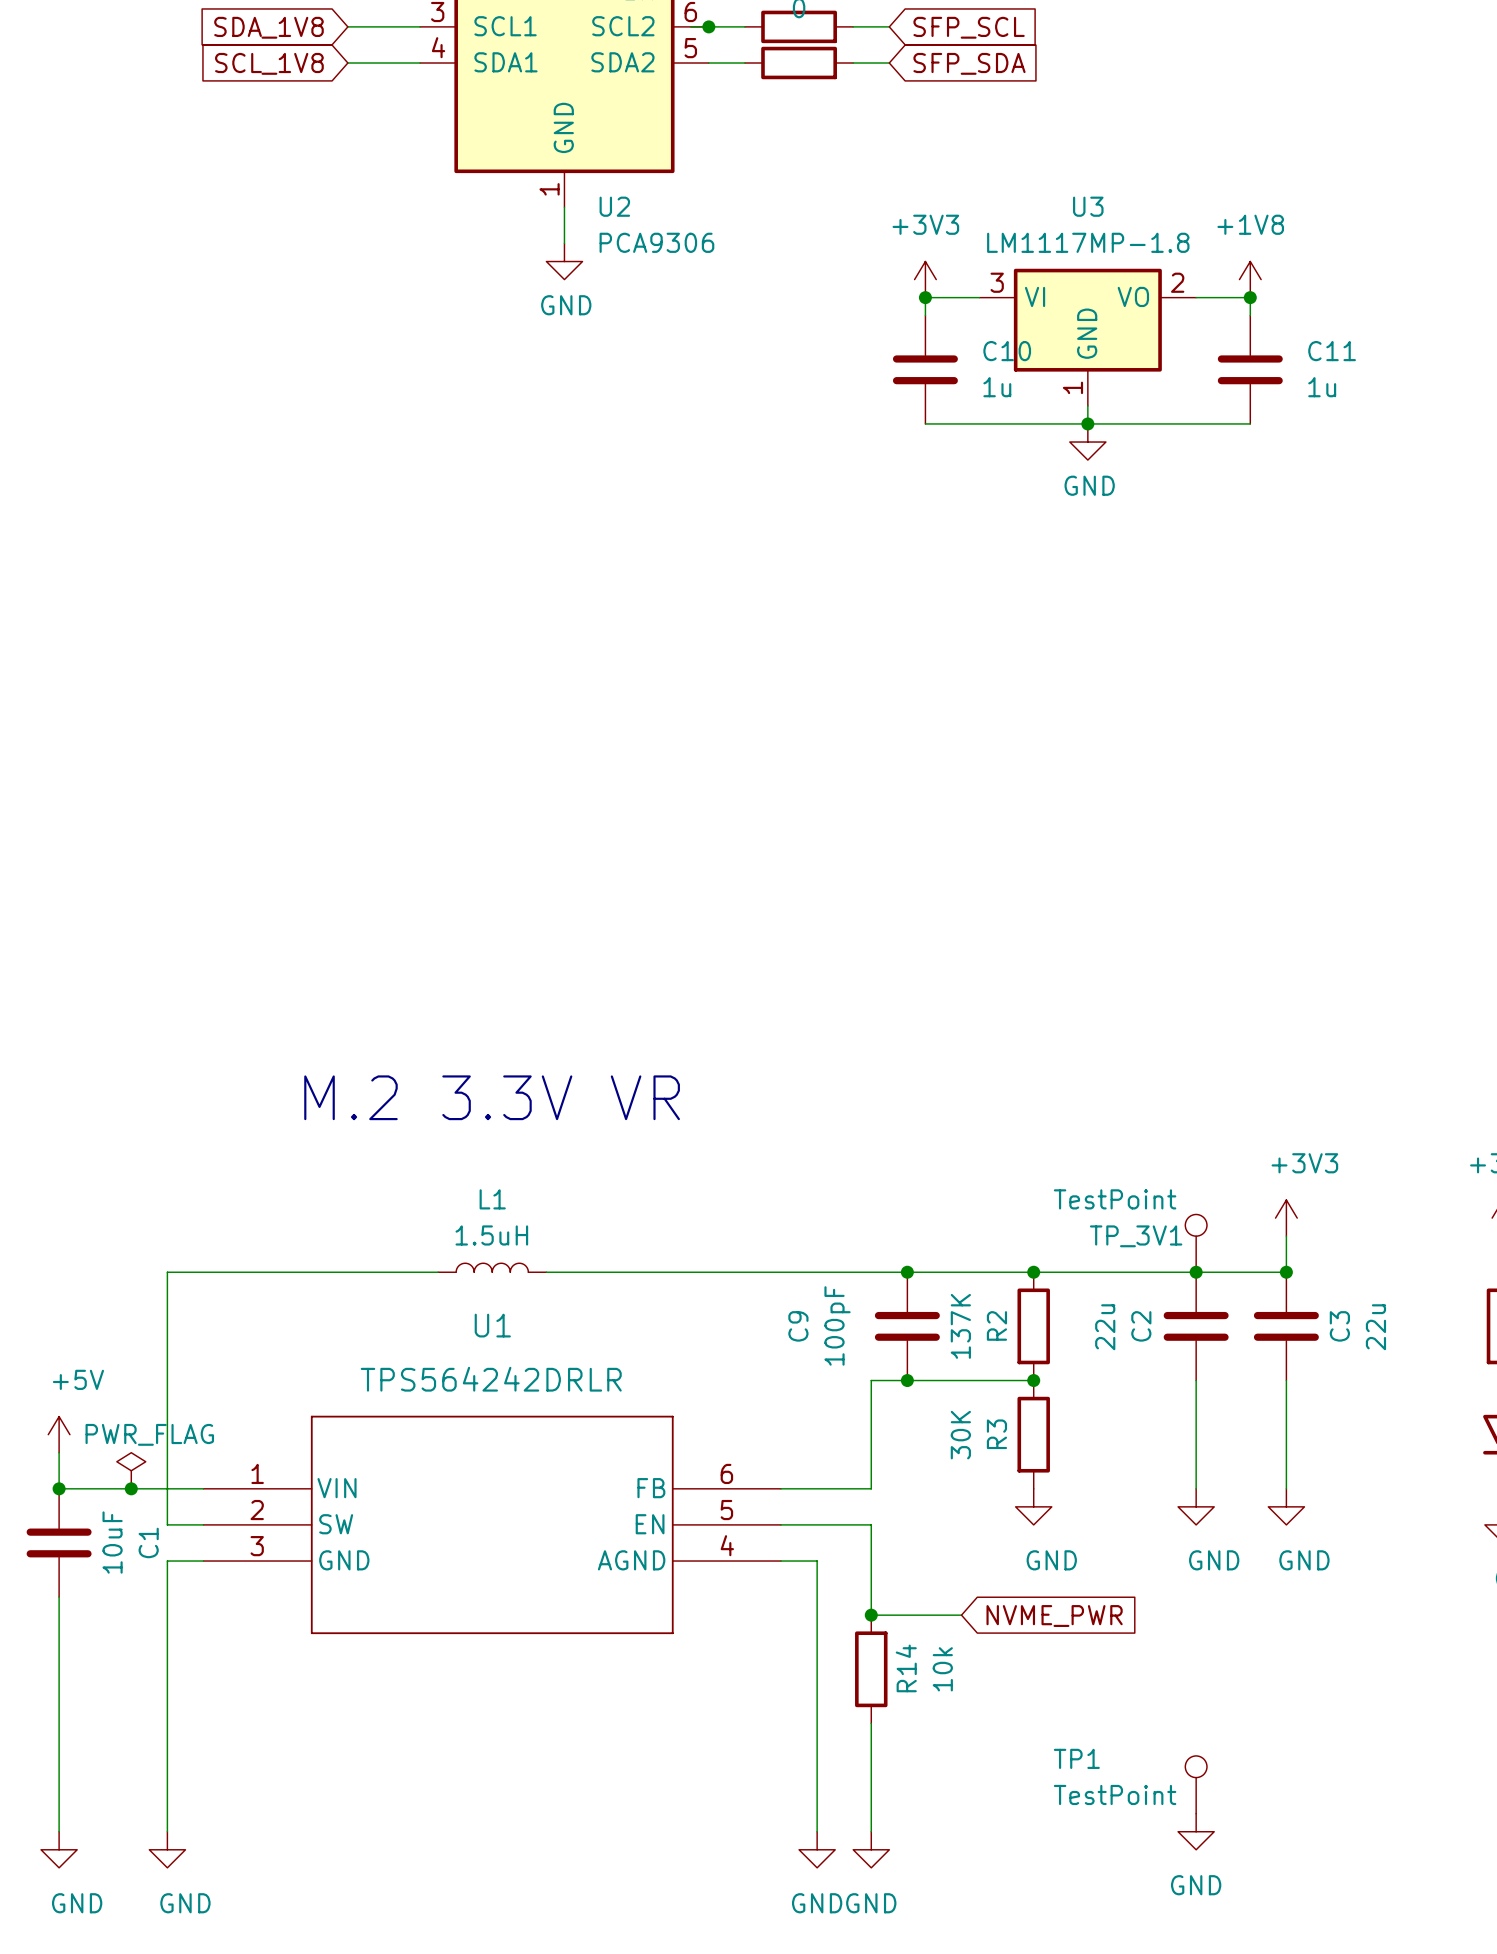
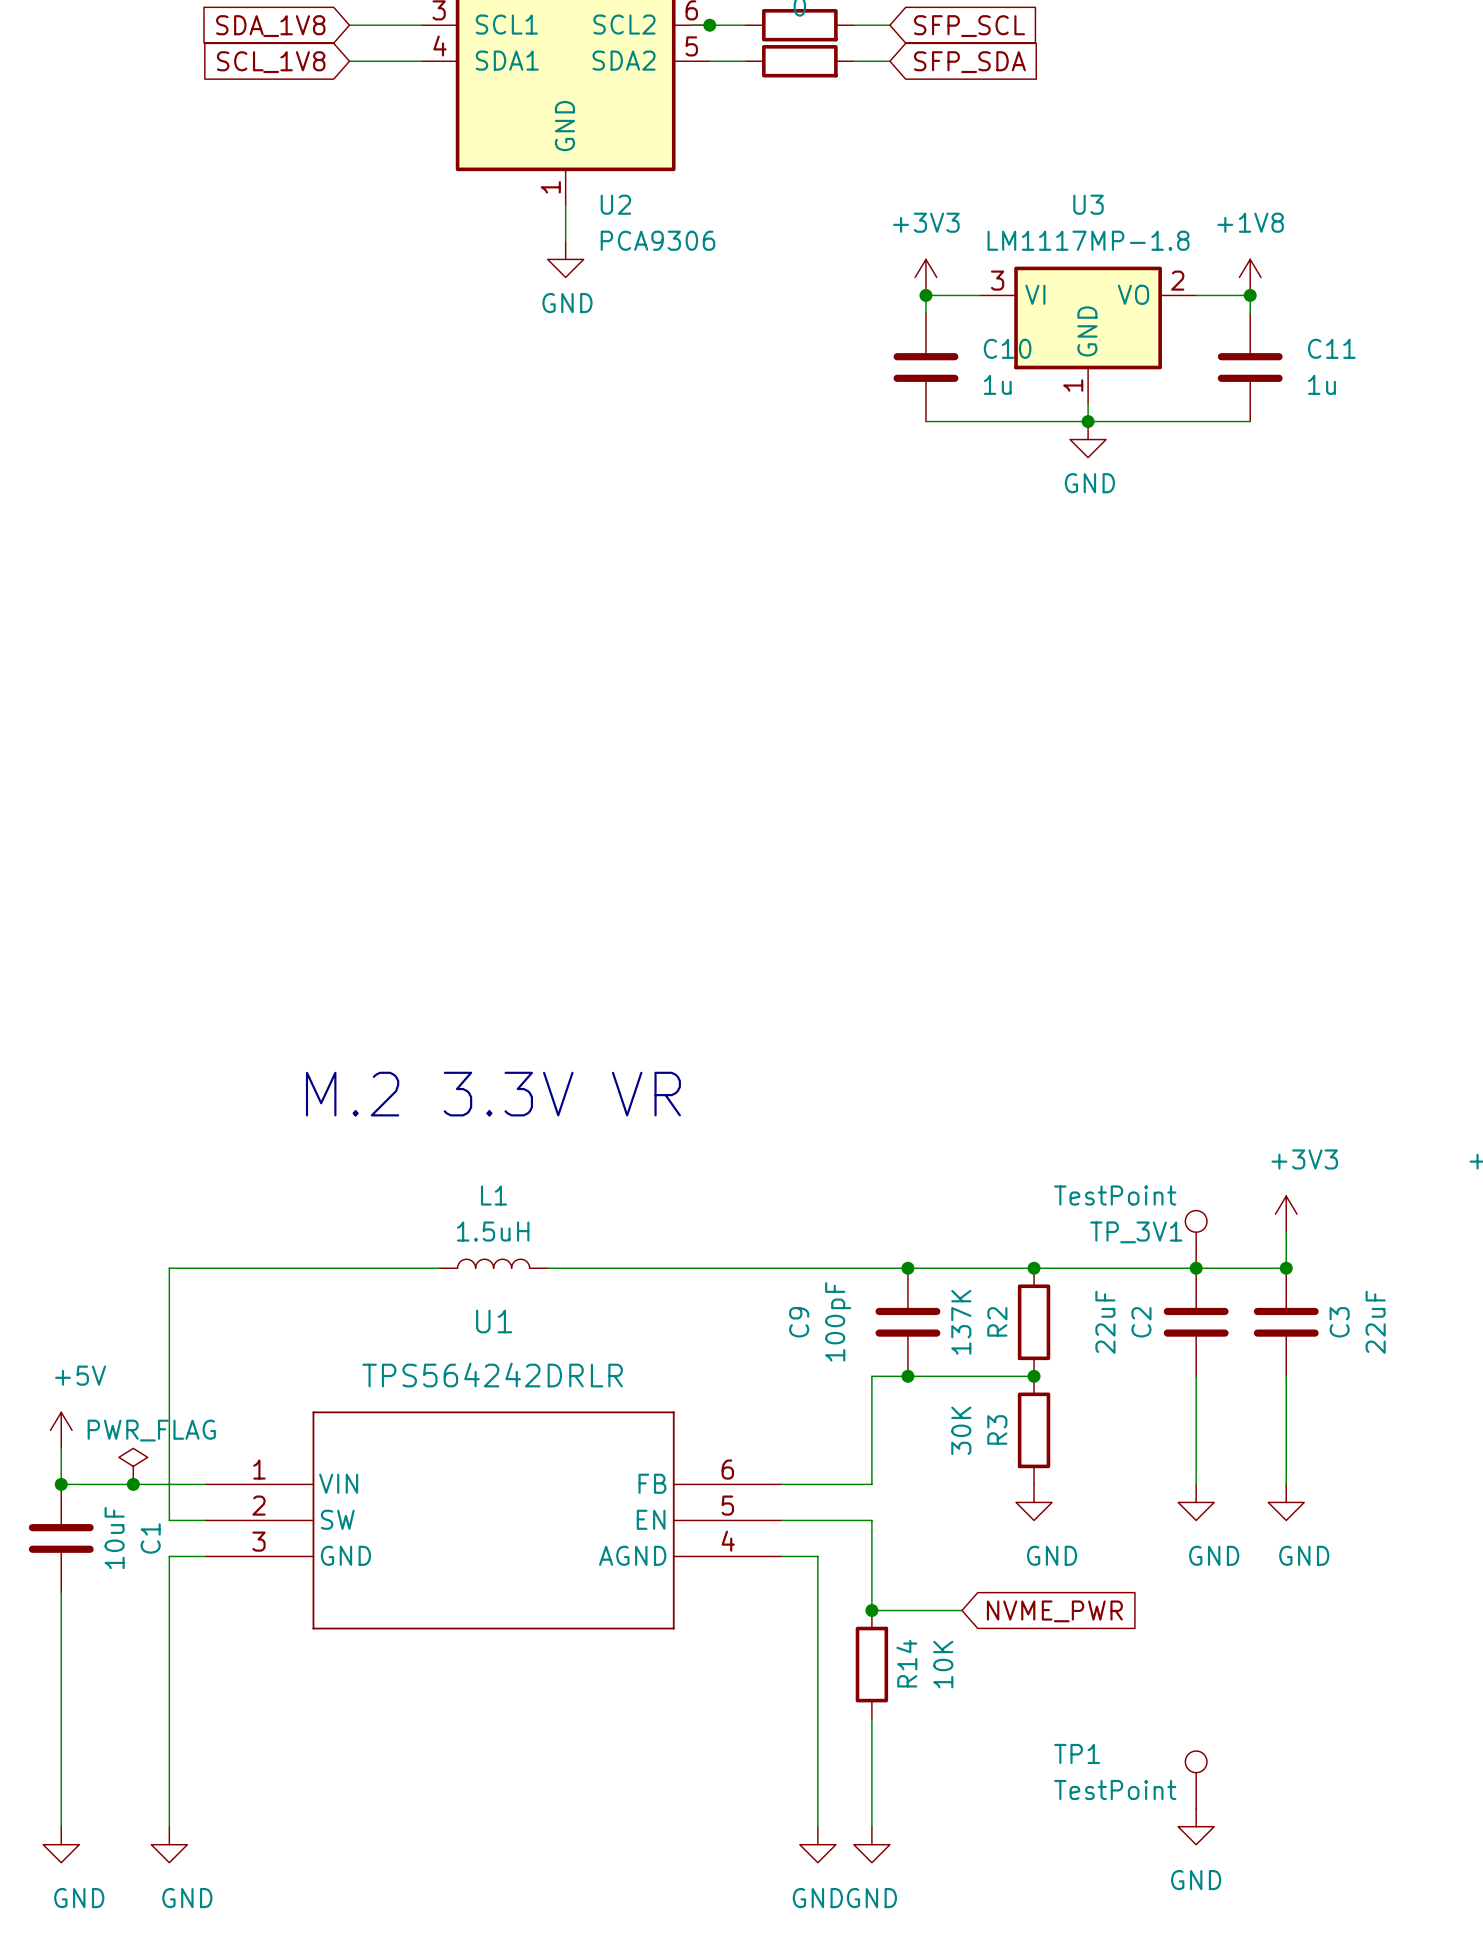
C2 value: 22u (1105, 1327) -> 22uF (1105, 1322)
C3 value: 22u (1375, 1327) -> 22uF (1375, 1322)
R14 value: 10k (942, 1669) -> 10K (943, 1664)

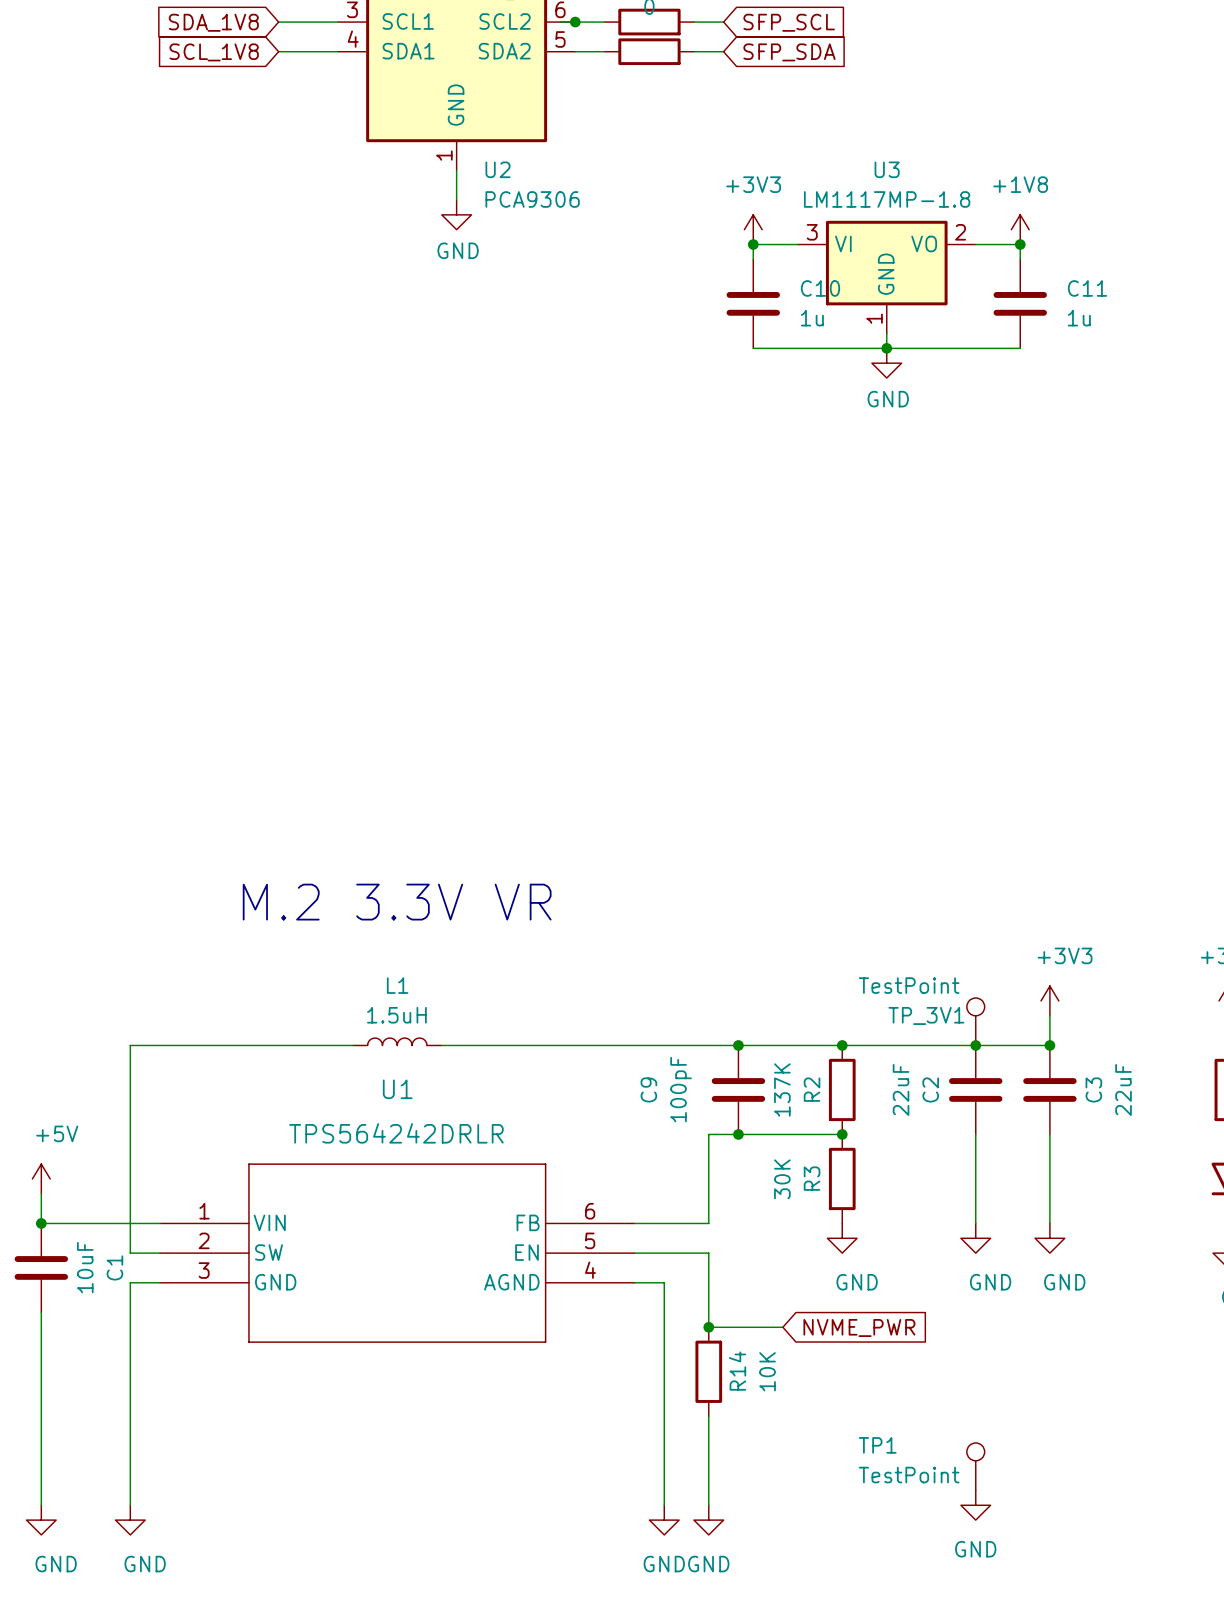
power symbol: PWR_FLAG (133, 1466) -> none
junction: (133, 1484) -> none

